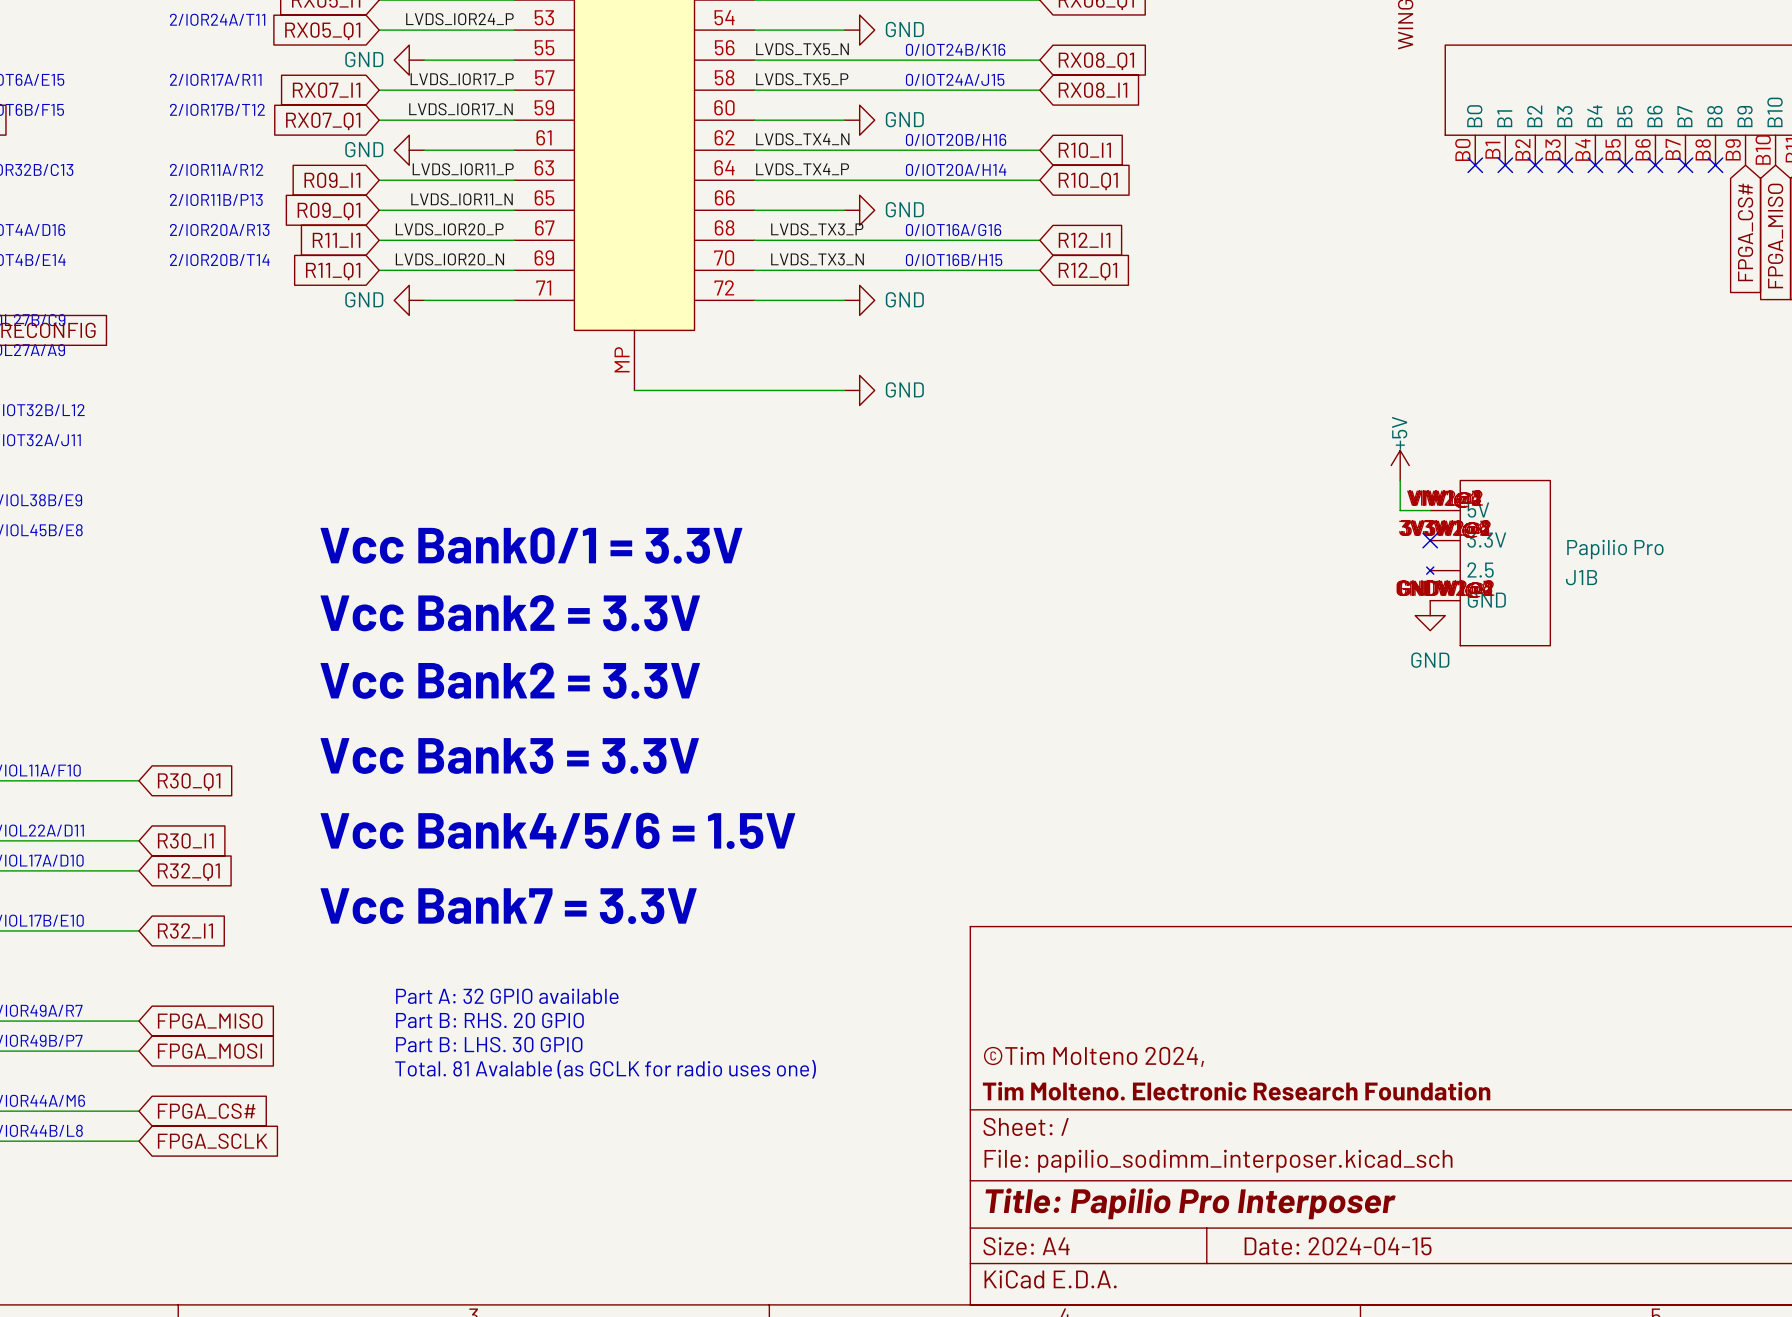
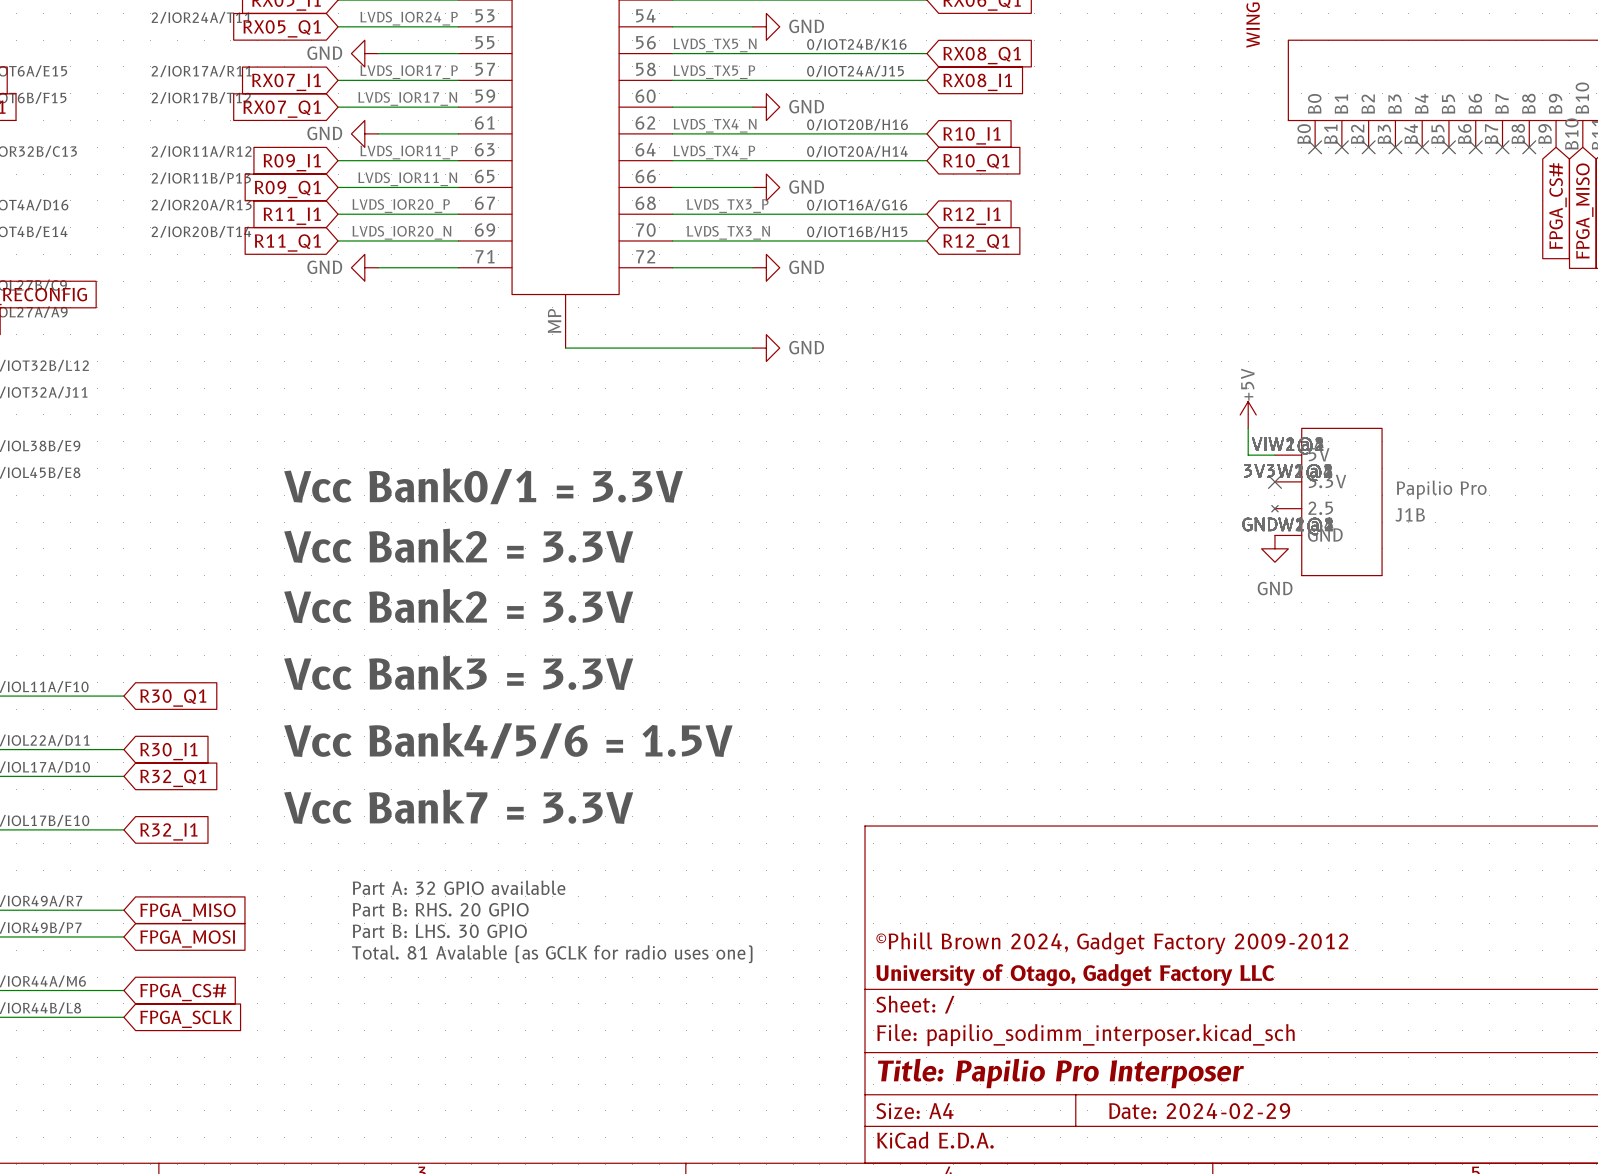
title block: ©Tim Molteno 2024, (1093, 1056) -> ©Phill Brown 2024, Gadget Factory 2009-2012 (1112, 943)
title block: Tim Molteno. Electronic Research Foundation (1236, 1091) -> University of Otago, Gadget Factory LLC (1075, 975)
title block: Date: 2024-04-15 (1338, 1246) -> Date: 2024-02-29 (1199, 1111)

